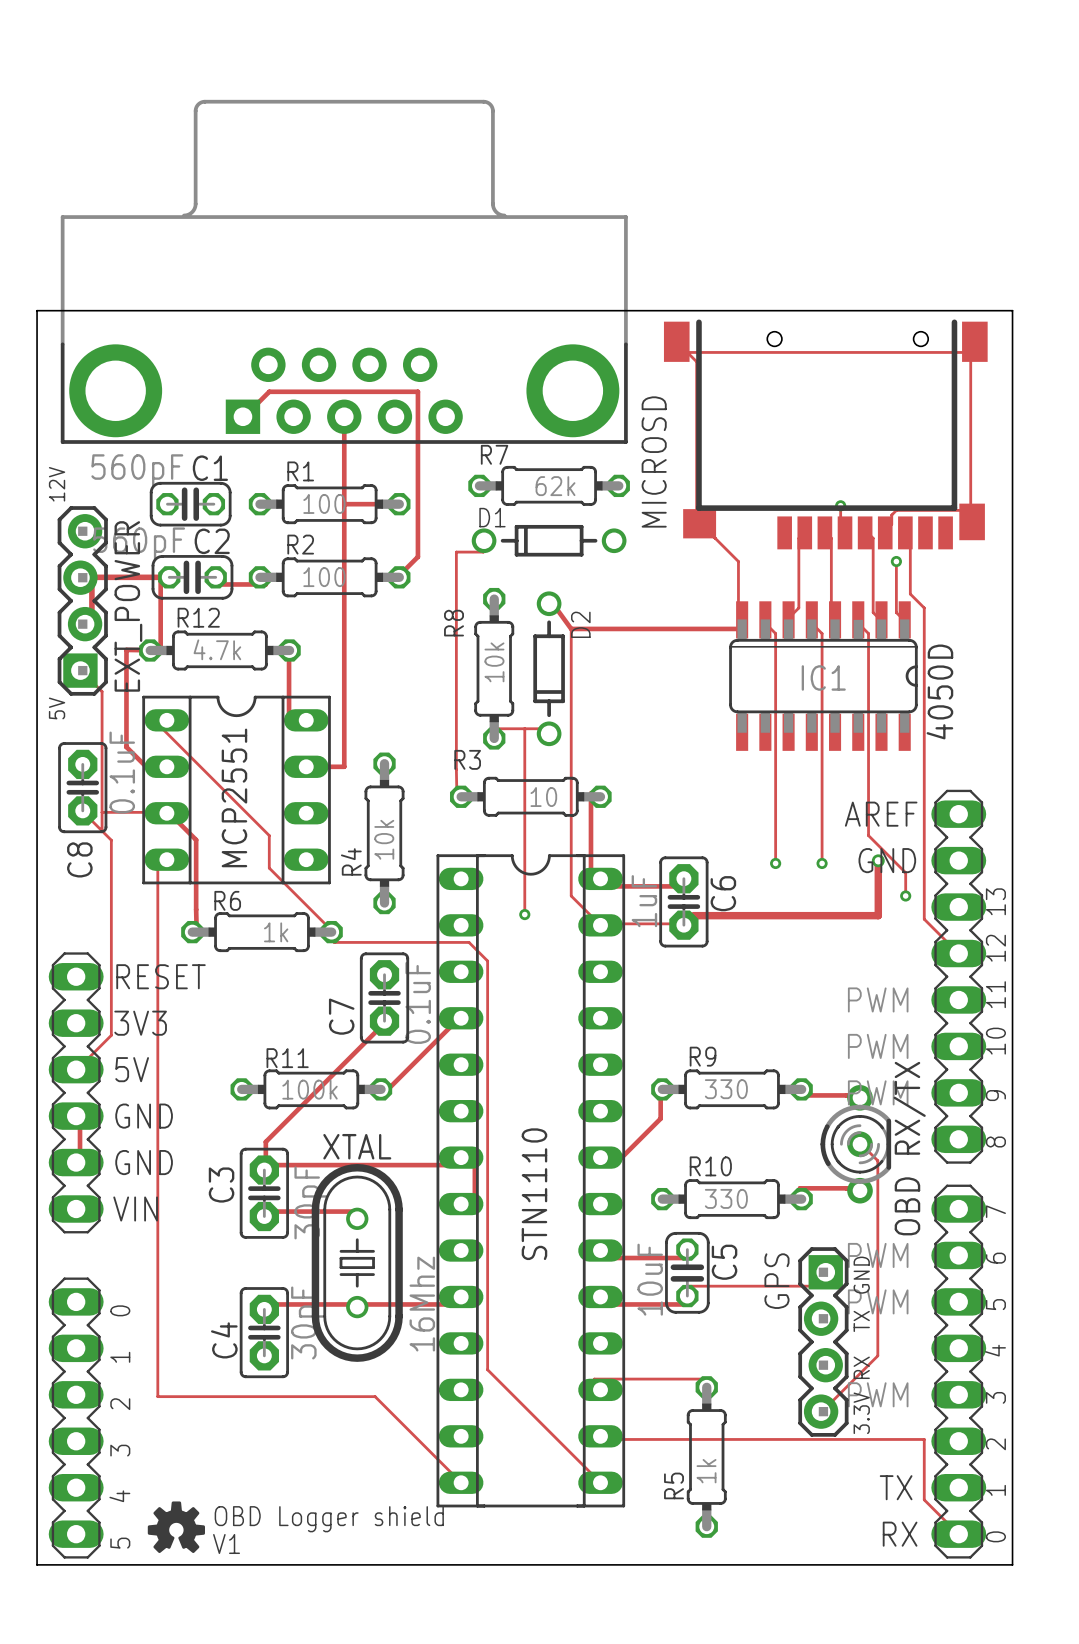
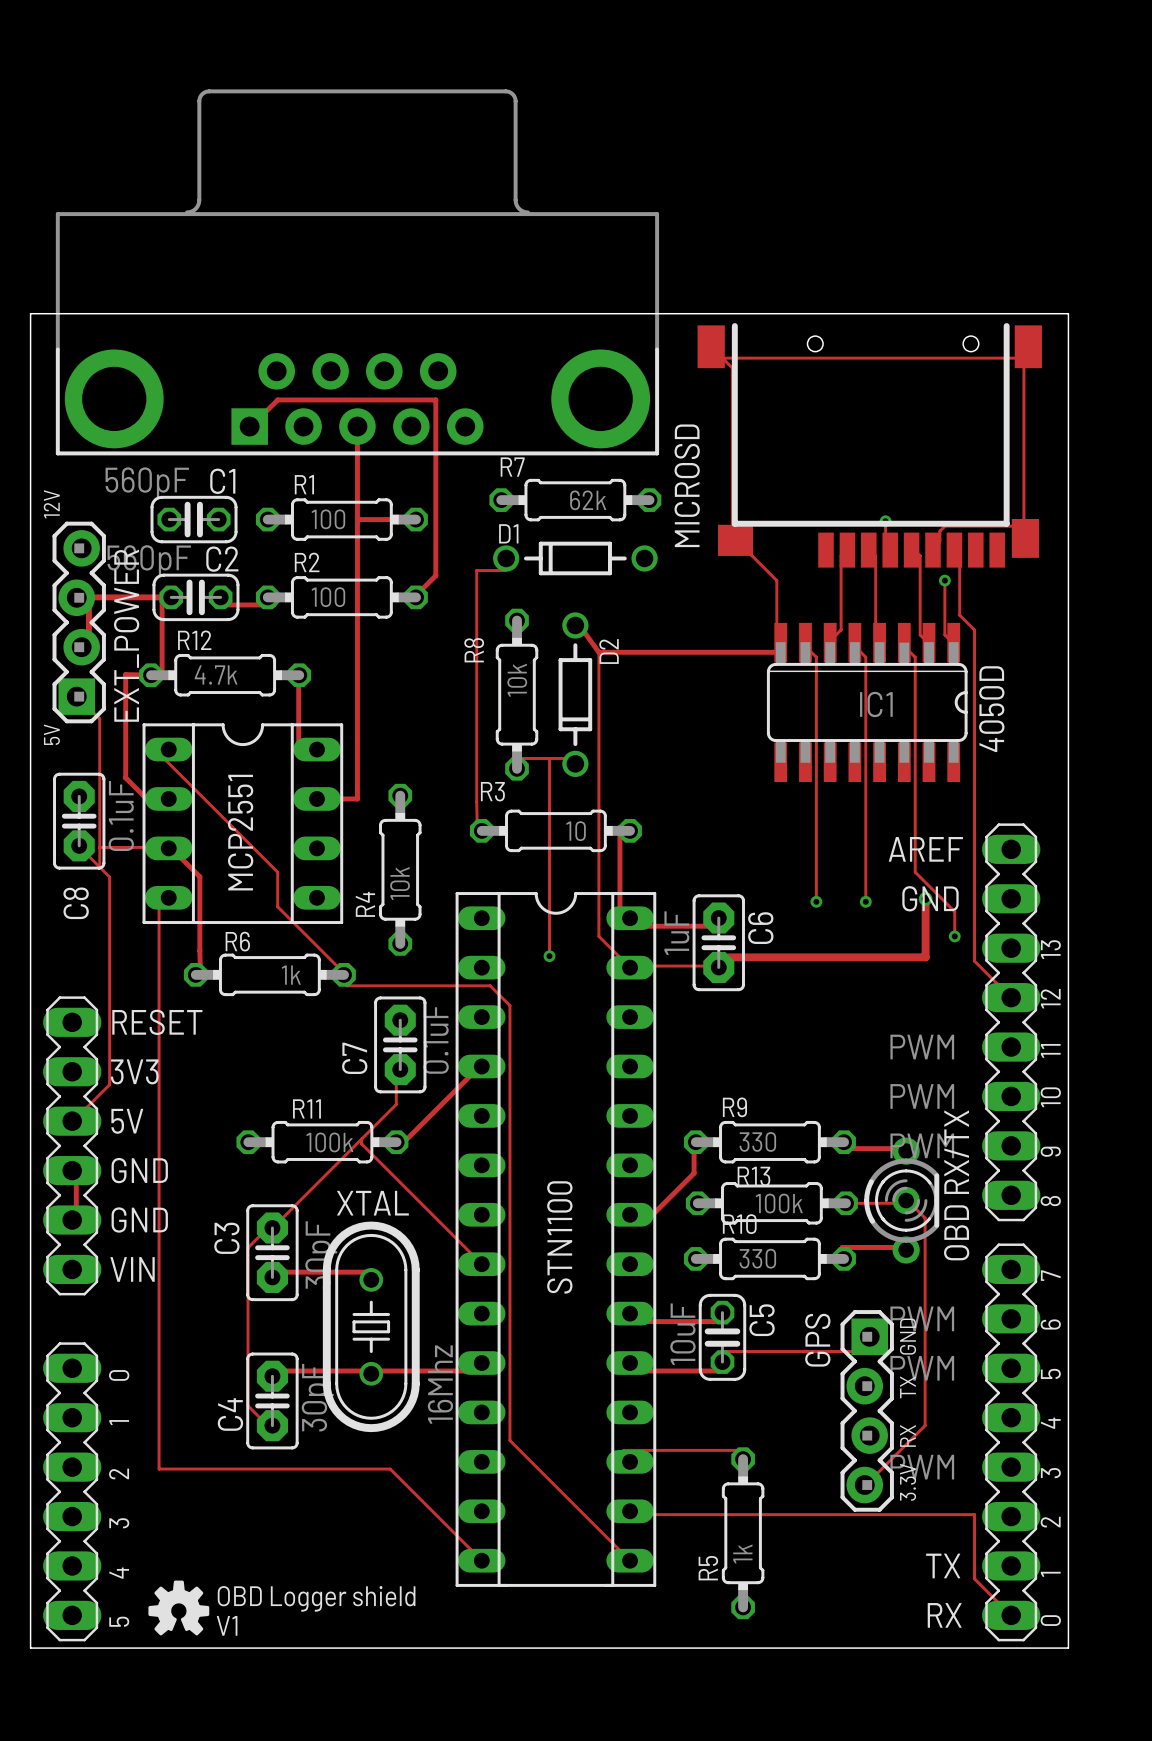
track: (384, 1021) (265, 1141) (265, 1165) (451, 1165) (461, 1157) (474, 1165) (474, 1211) (461, 1204) -> (361, 1139) (361, 1143) (481, 1264)
track: none -> (400, 1069) (396, 1069) (396, 1104) (272, 1227) (267, 1227) (248, 1247) (248, 1405) (267, 1425) (272, 1425)
track: none -> (906, 1200) (905, 1203) (846, 1203)
R13: none -> 100k (771, 1203)
part value: STN1110 (534, 1194) -> STN1100 (559, 1237)

